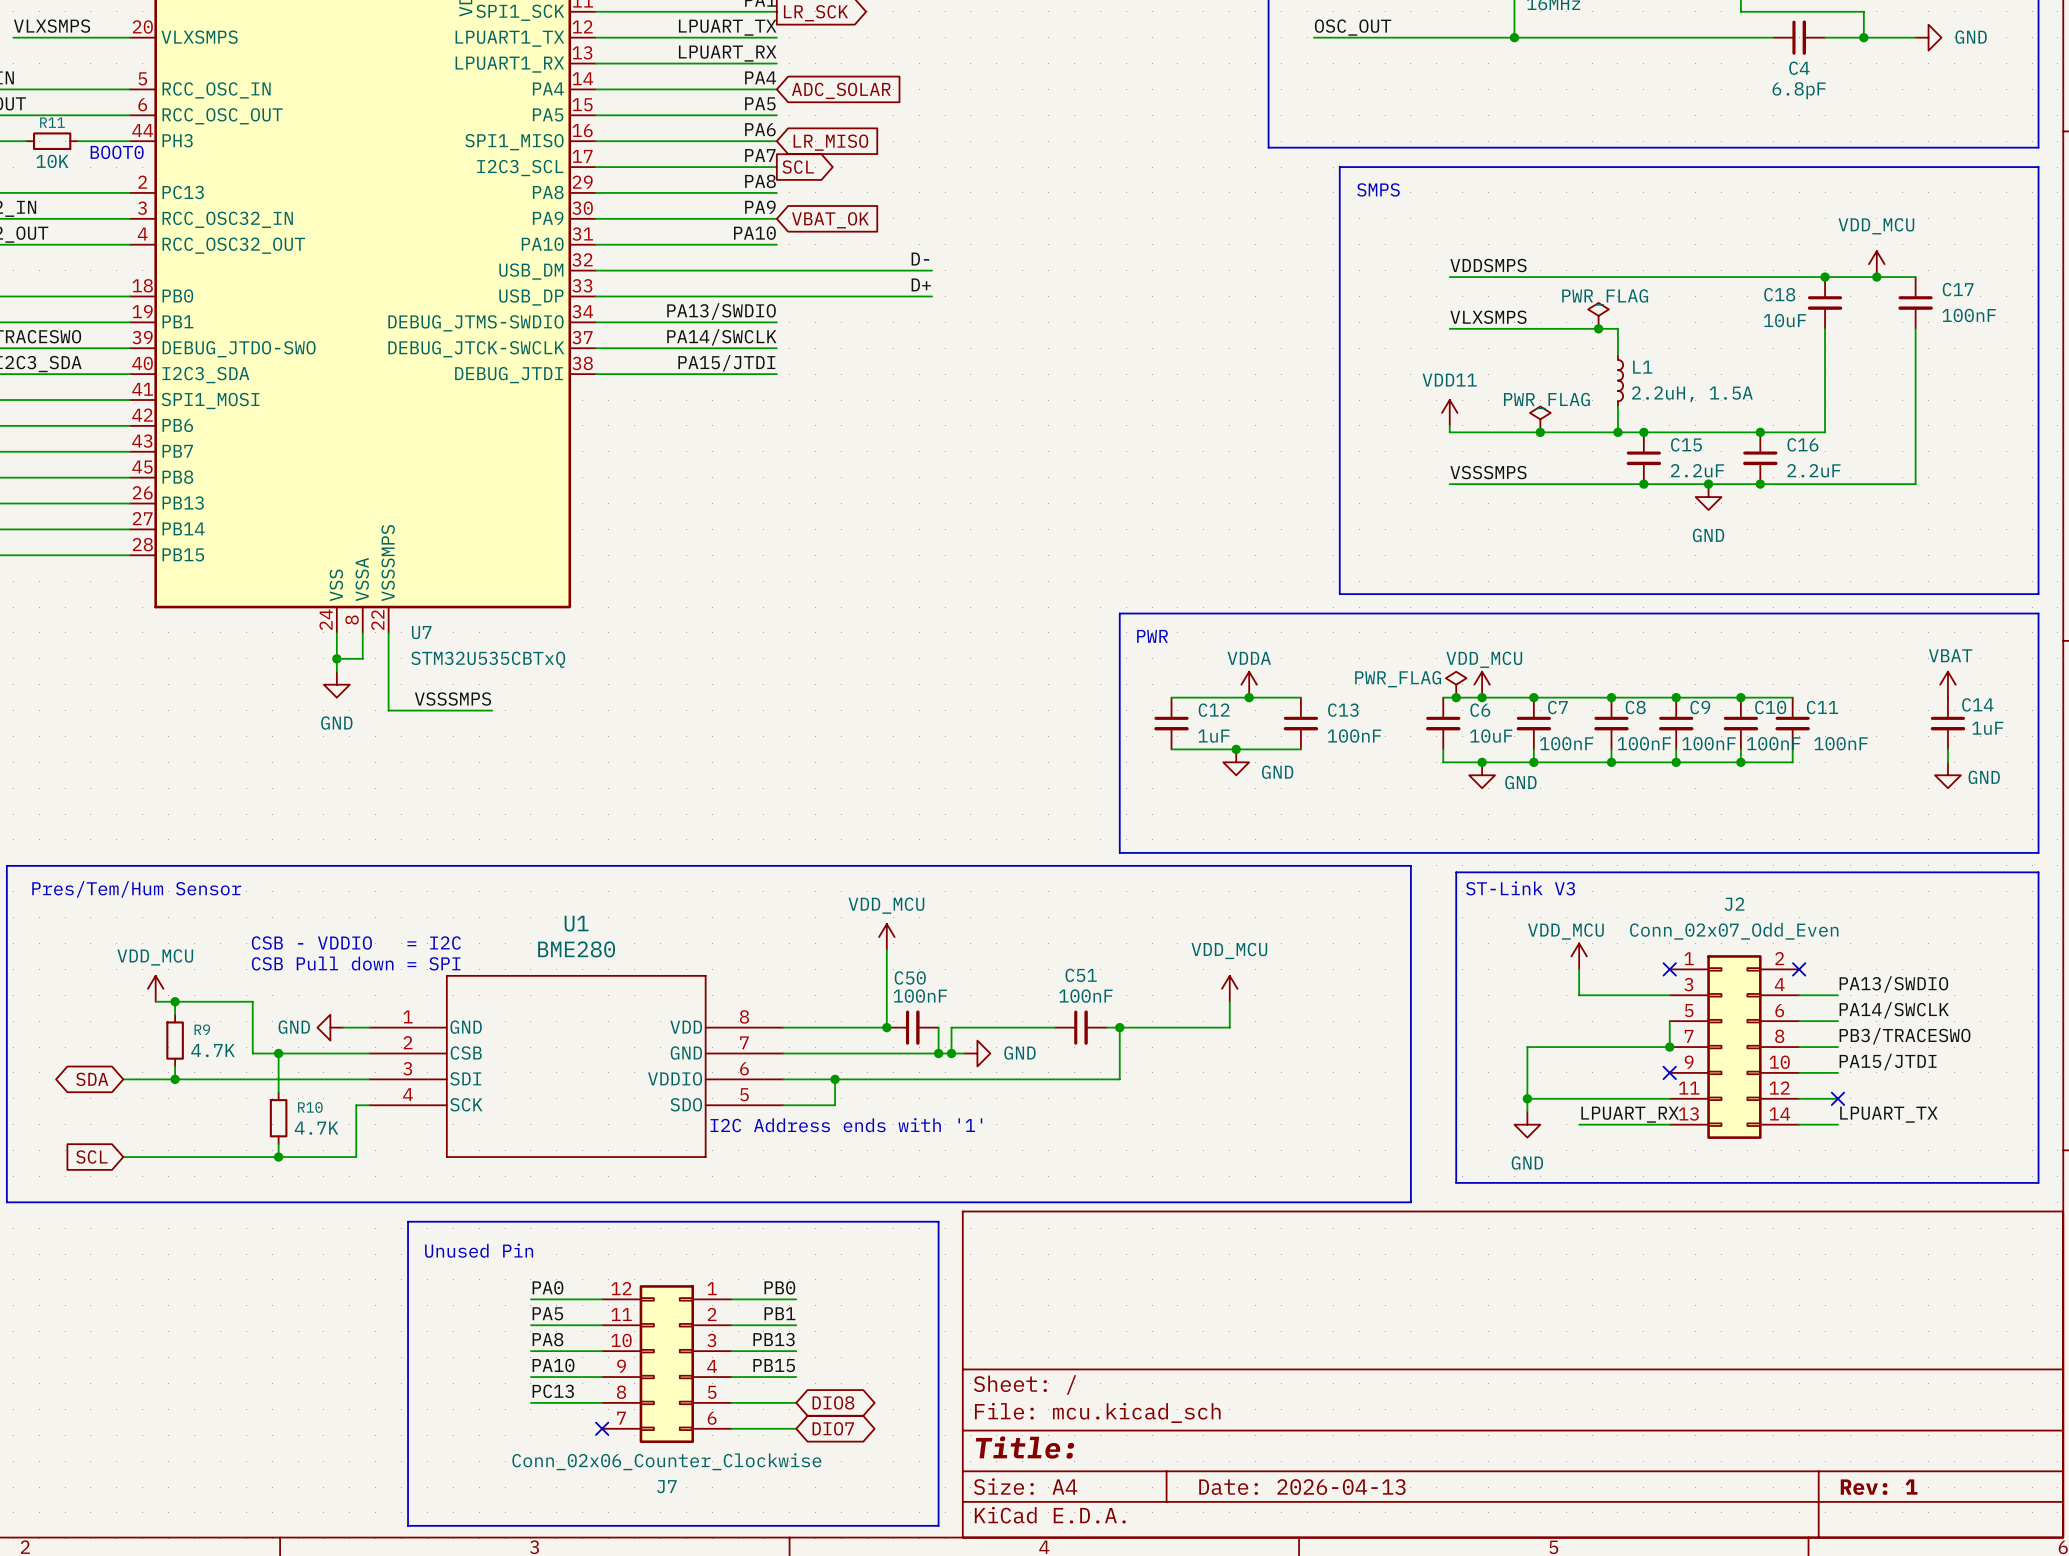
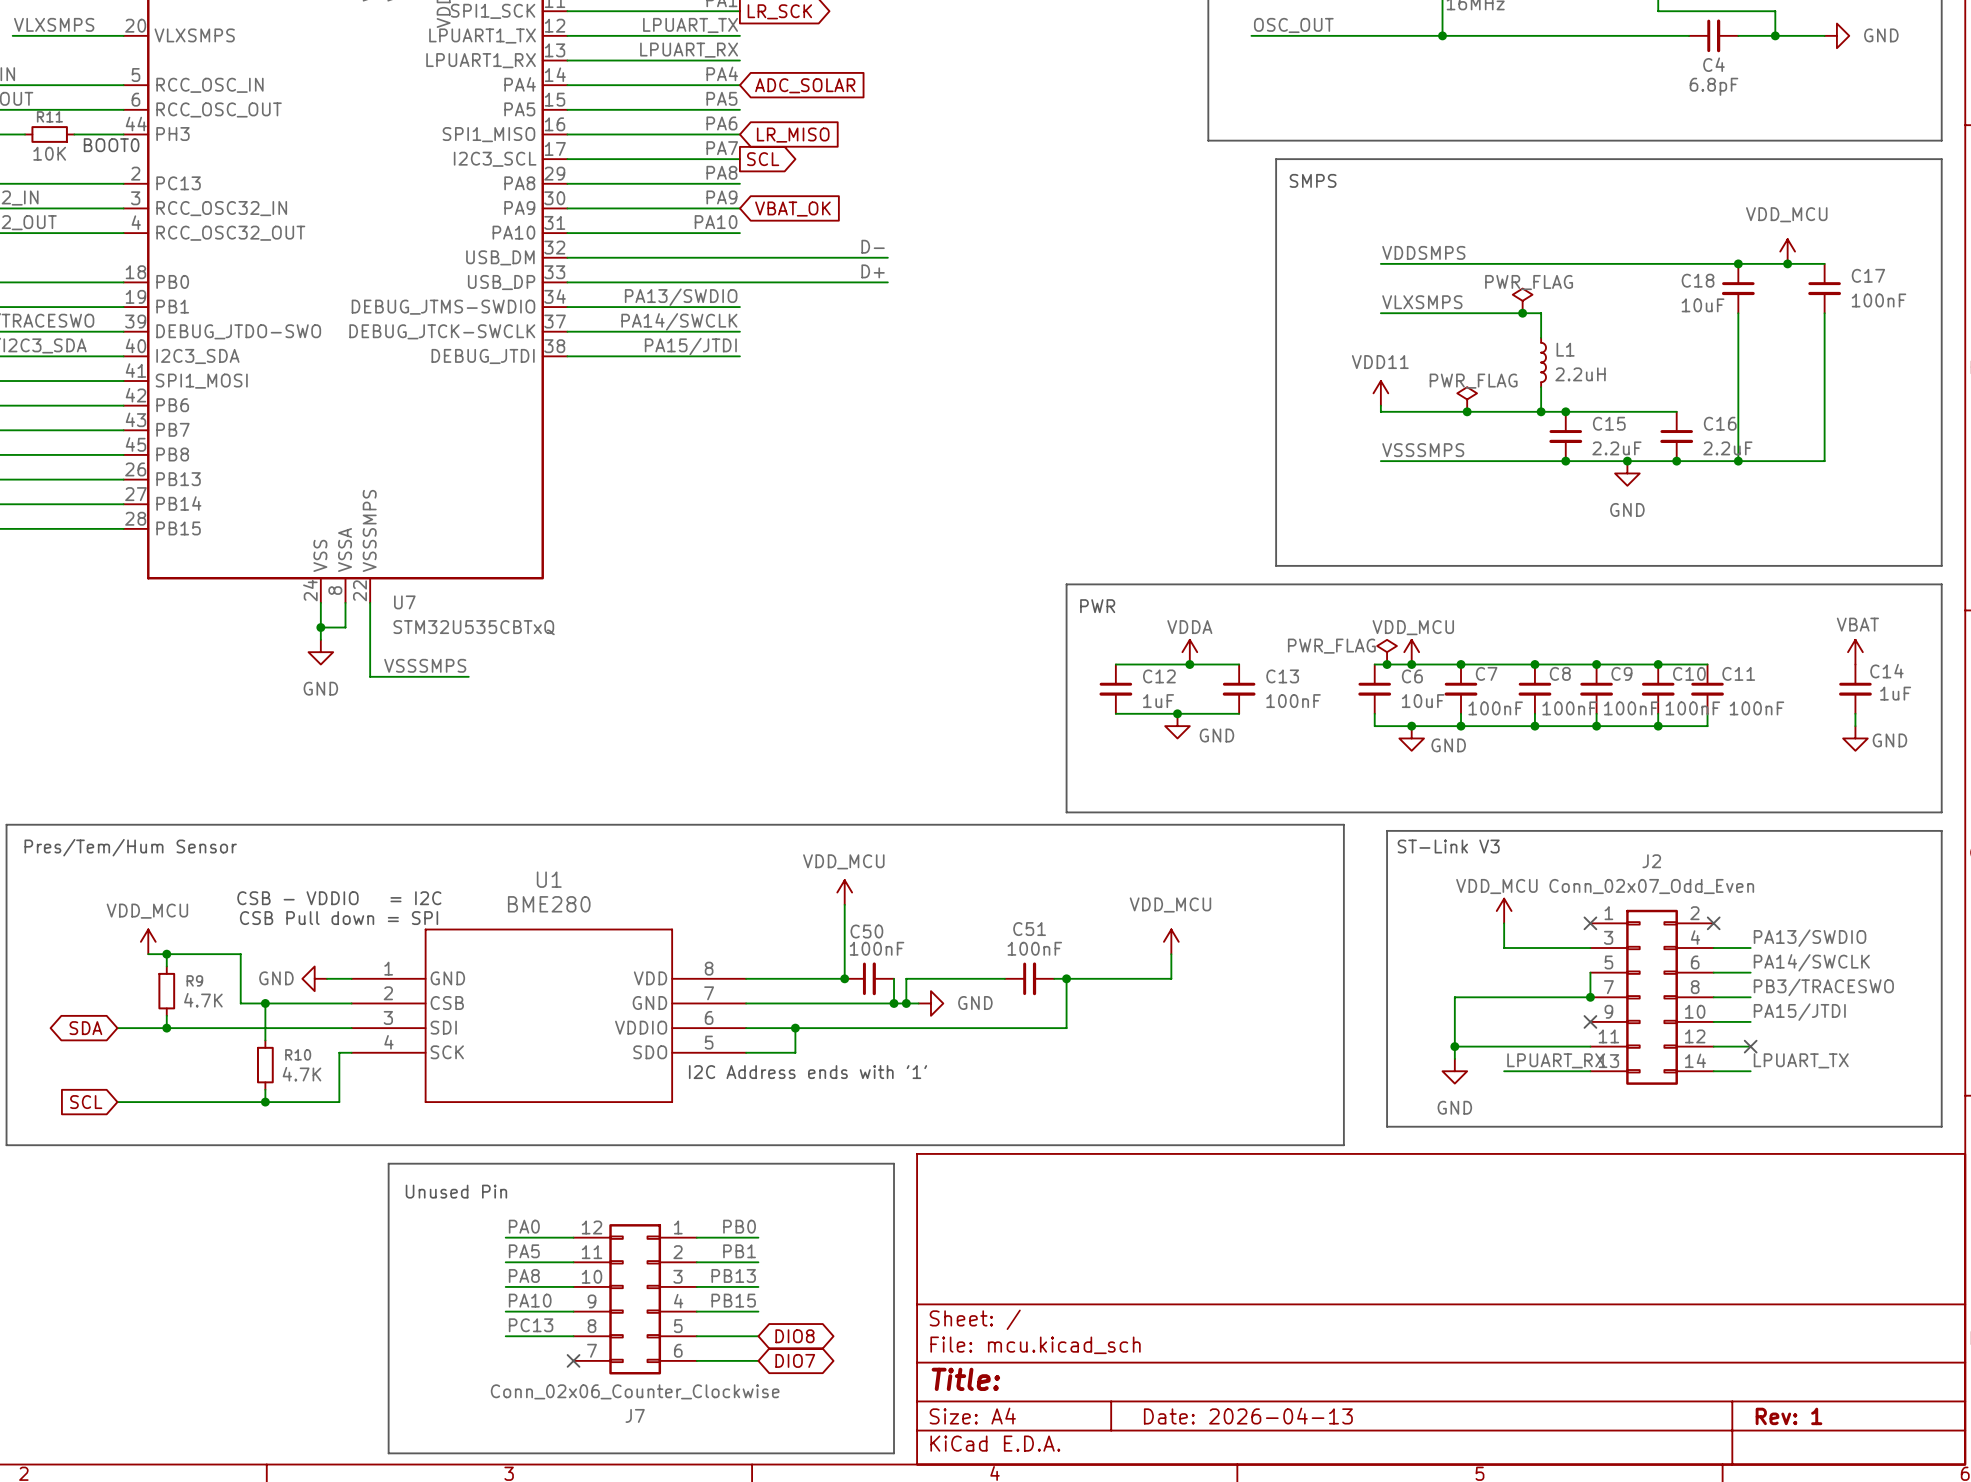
L1 value: 2.2uH, 1.5A (1692, 394) -> 2.2uH (1580, 374)
wire: (1760, 432) (1825, 432) -> (1738, 461) (1738, 411)
junction: (1760, 432) -> none
junction: none -> (1738, 461)

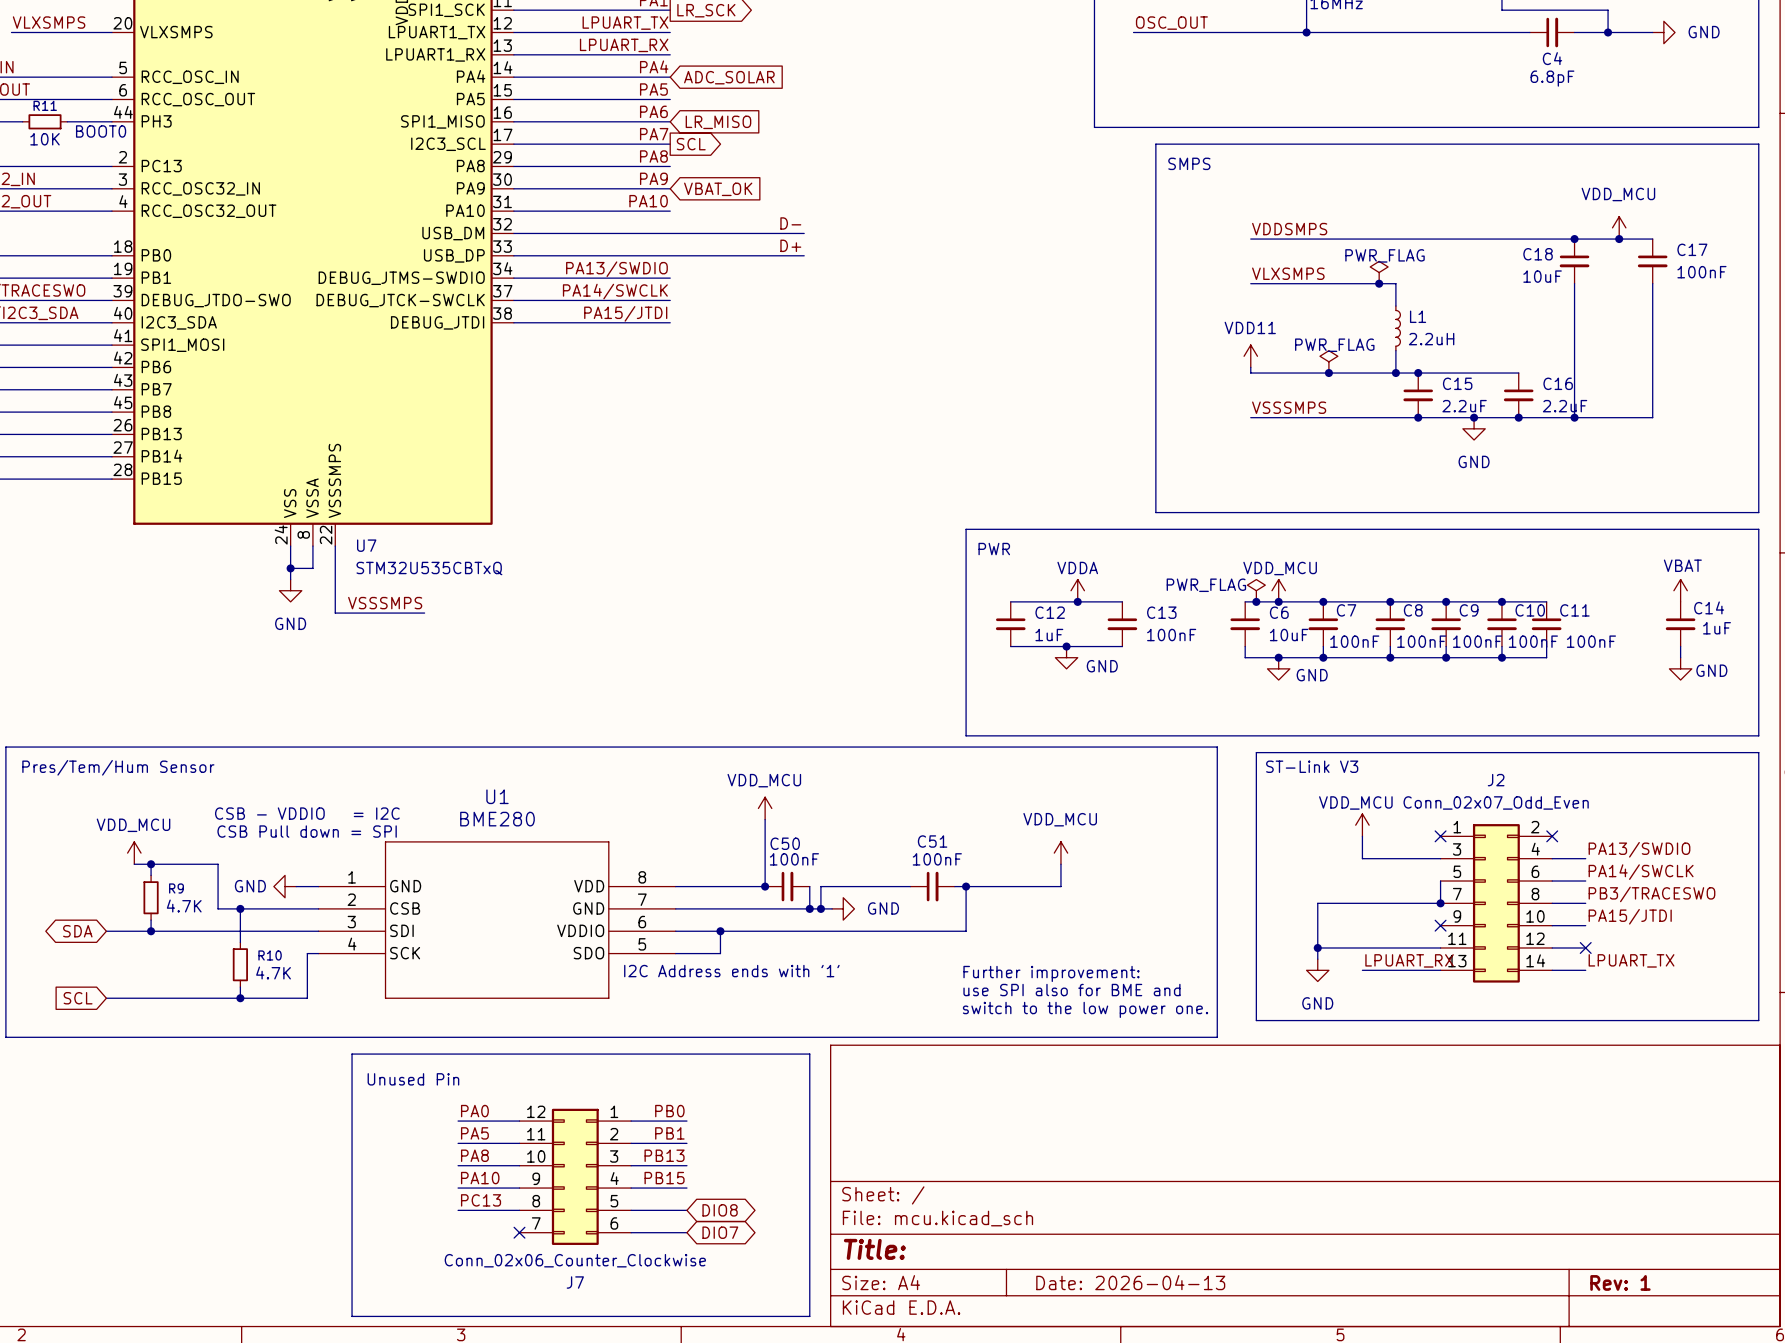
text: none -> Further improvement: (1051, 973)
text: none -> use SPI also for BME and (1071, 990)
text: none -> switch to the low power one. (1085, 1009)

